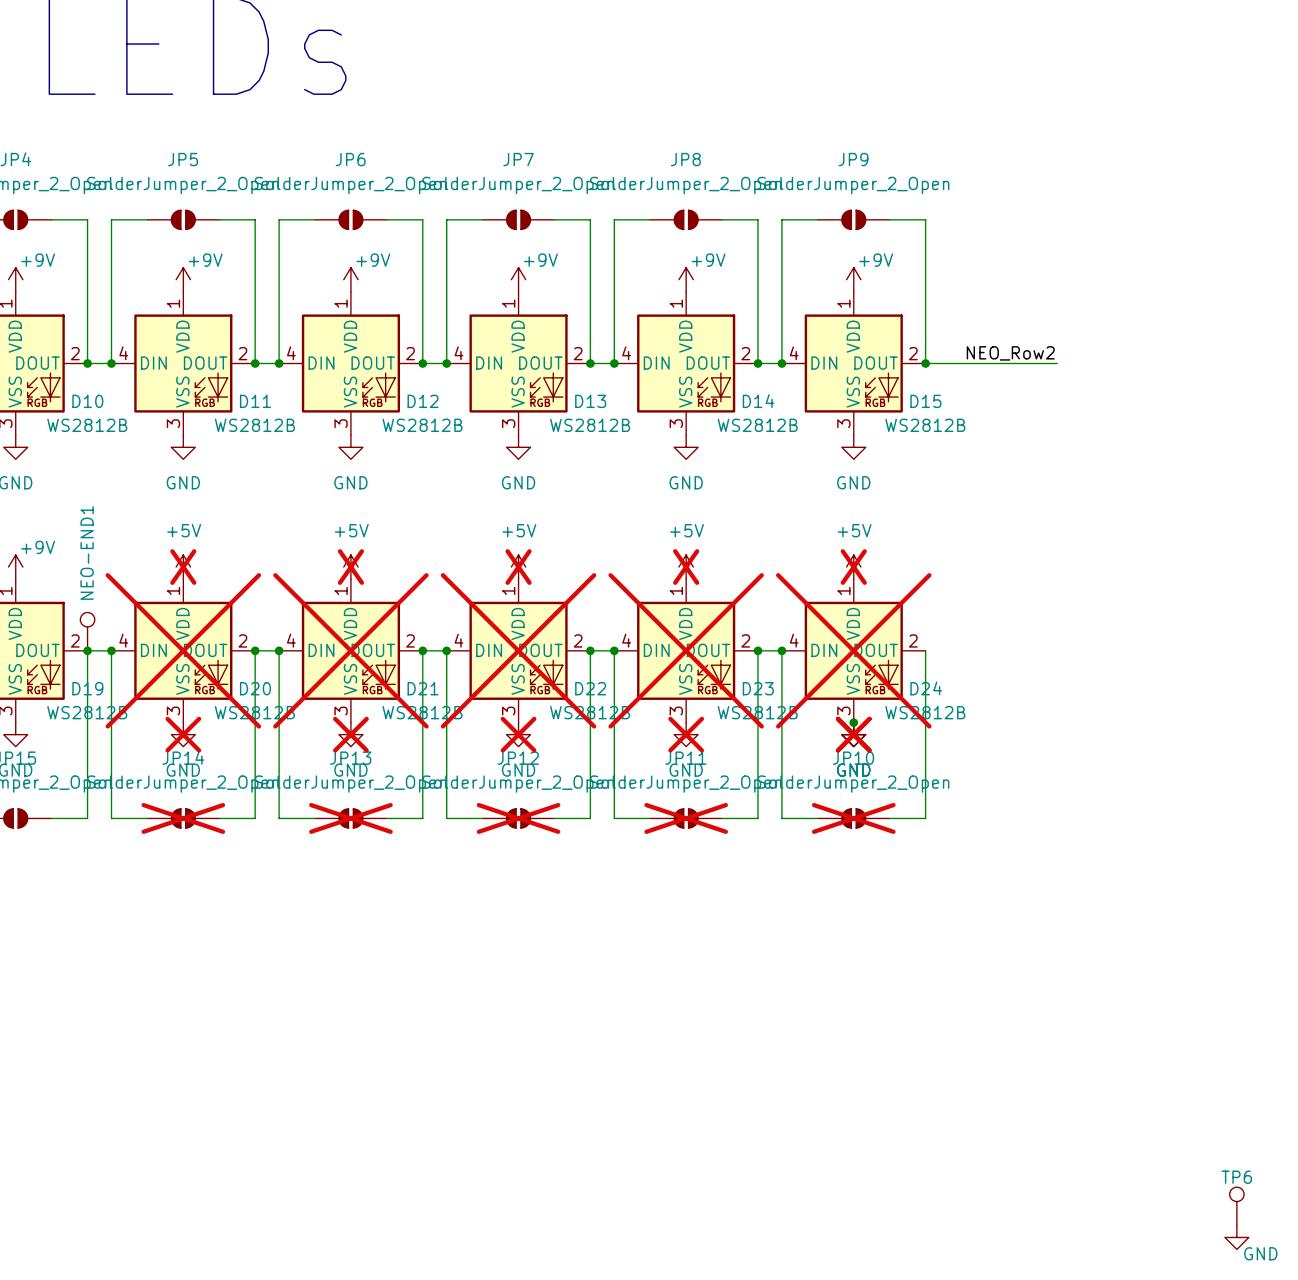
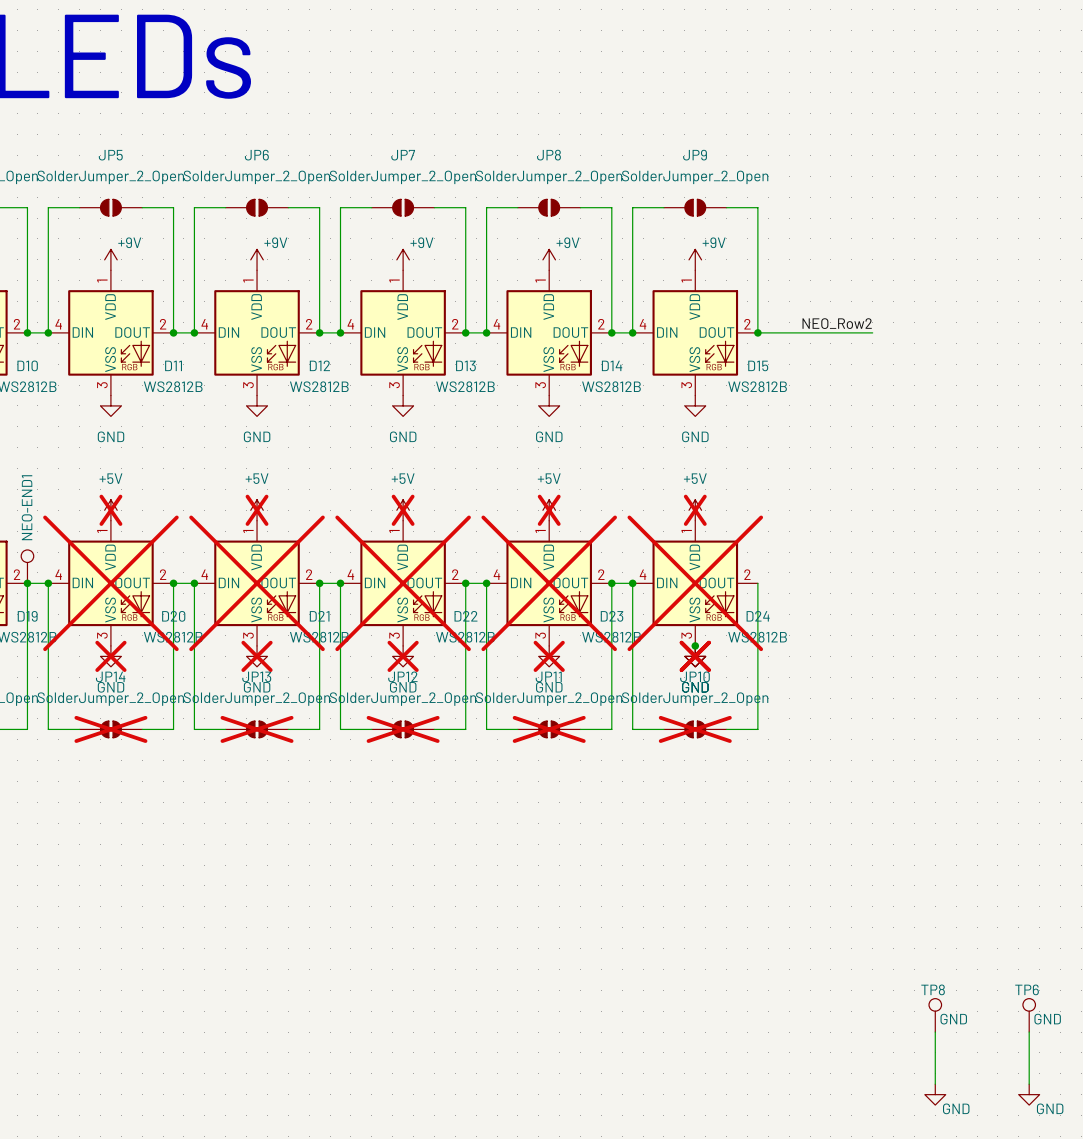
TP8: none -> GND (935, 1015)
TP6 value: none -> GND (1047, 1019)
wire: none -> (935, 1032) (935, 1084)
wire: none -> (1029, 1032) (1029, 1084)
TP6 position: (1236, 1206) -> (1029, 1015)
power symbol: none -> GND (935, 1094)

